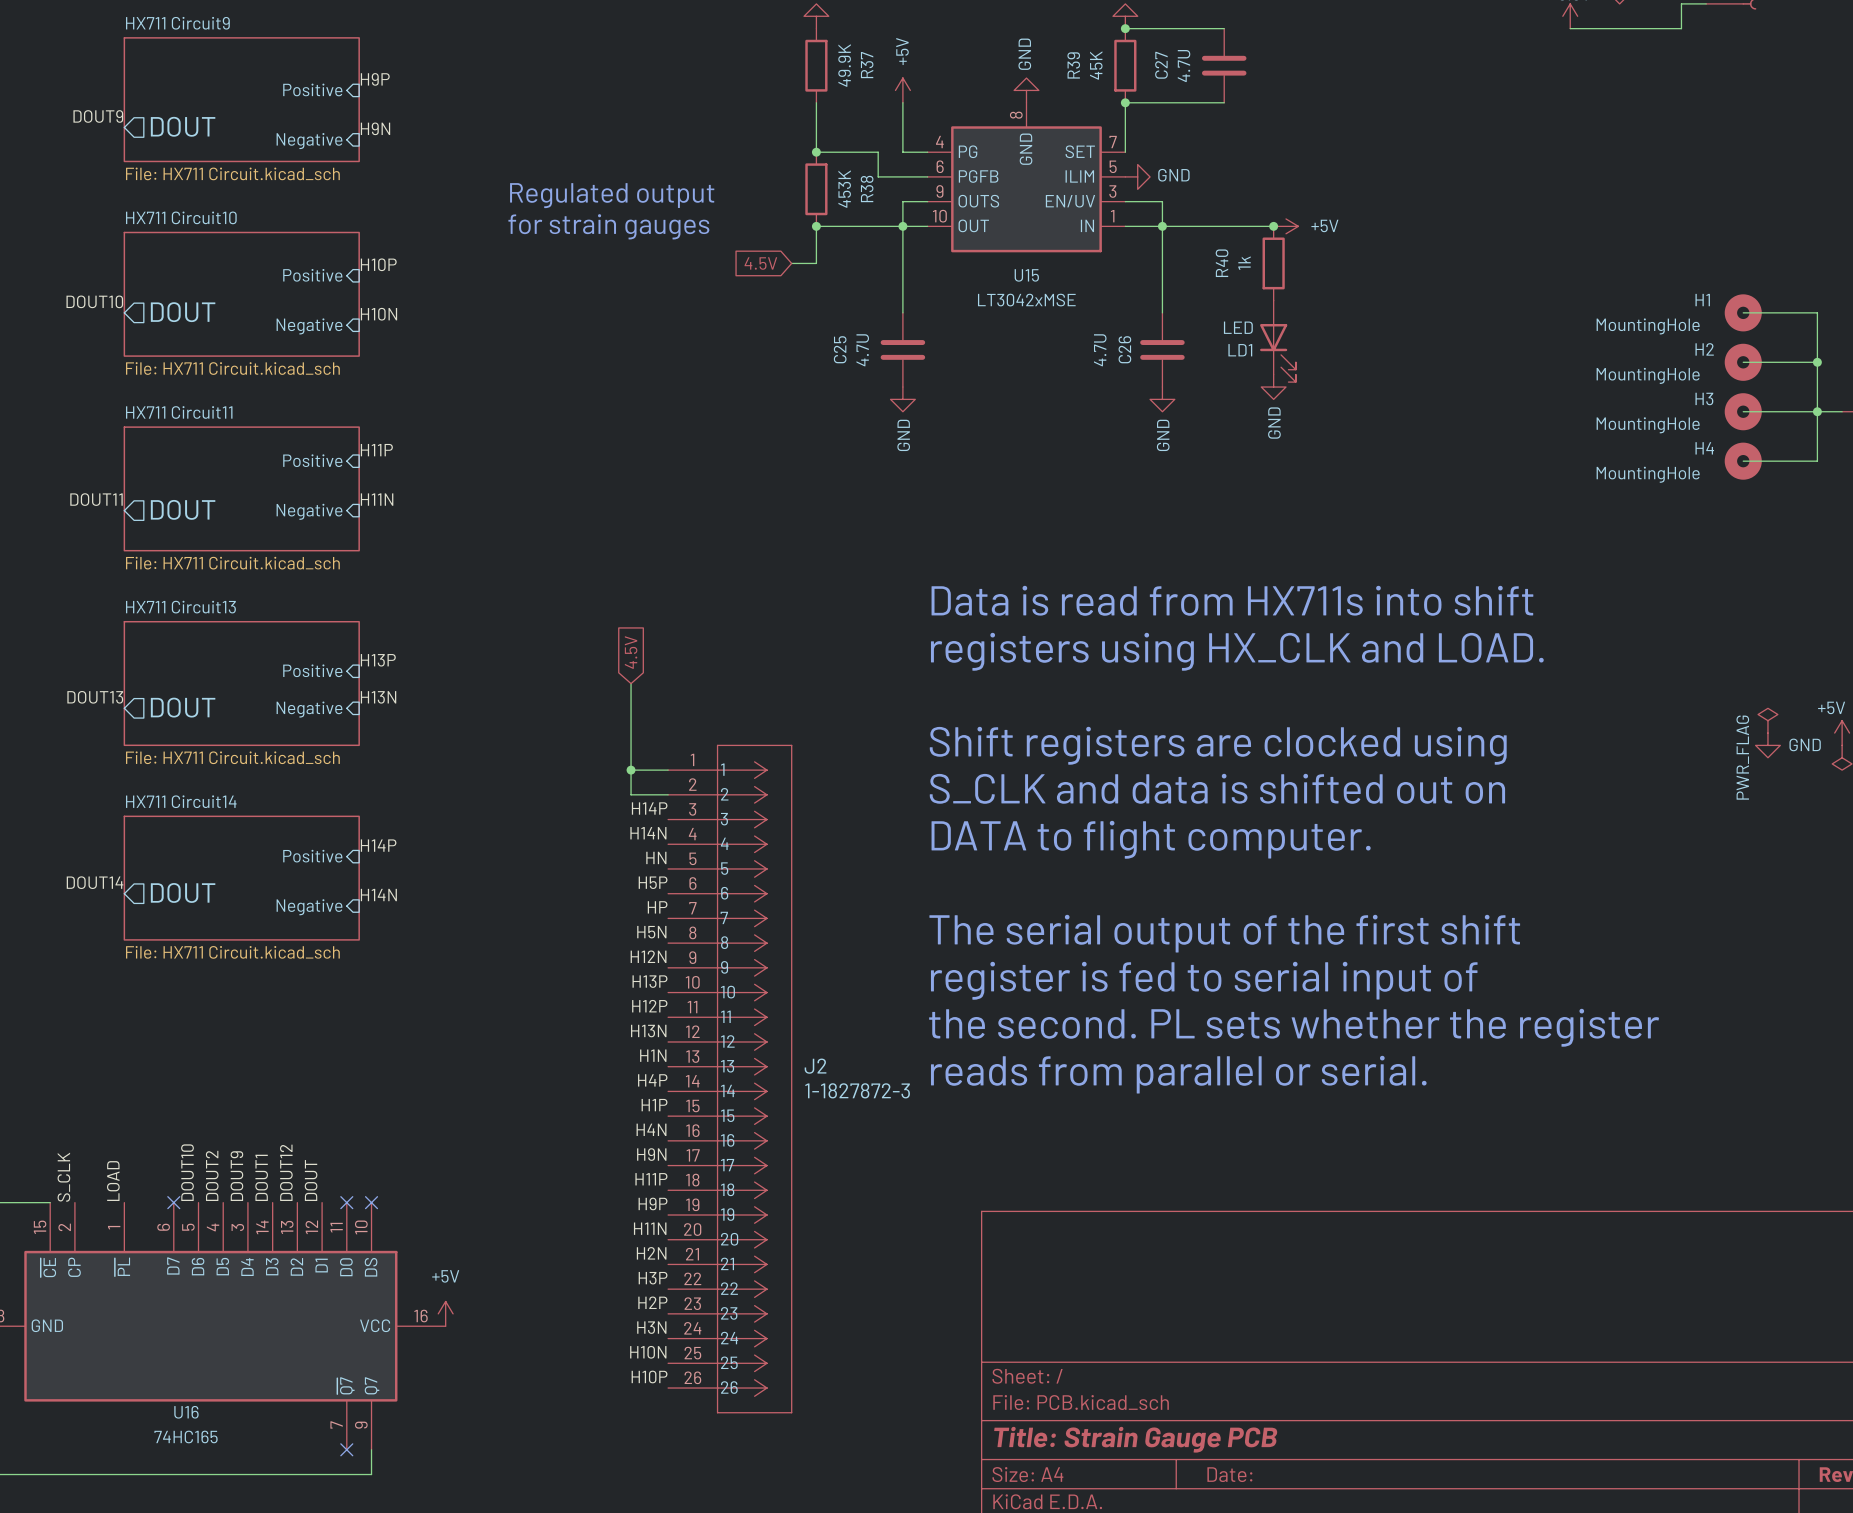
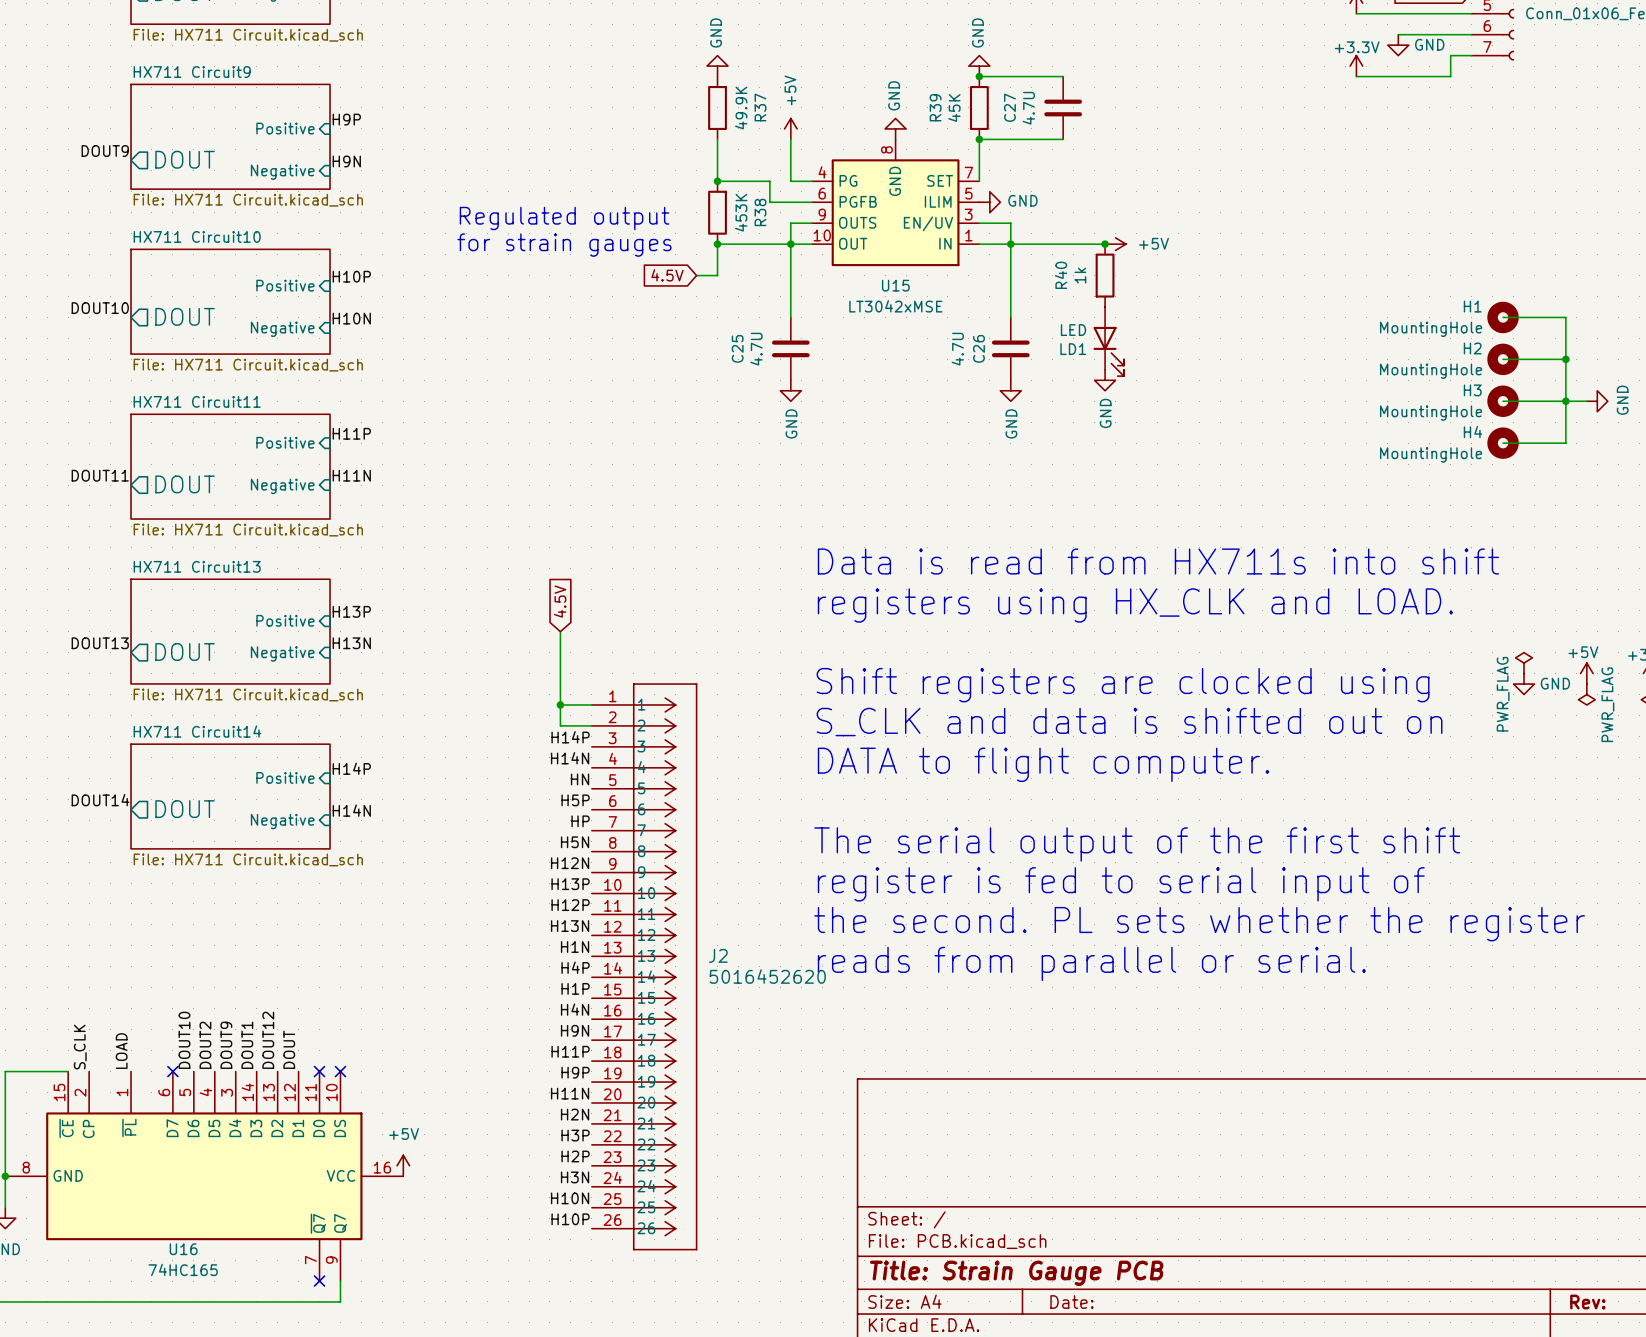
J2 value: 1-1827872-3 (857, 1090) -> 5016452620 (767, 976)

